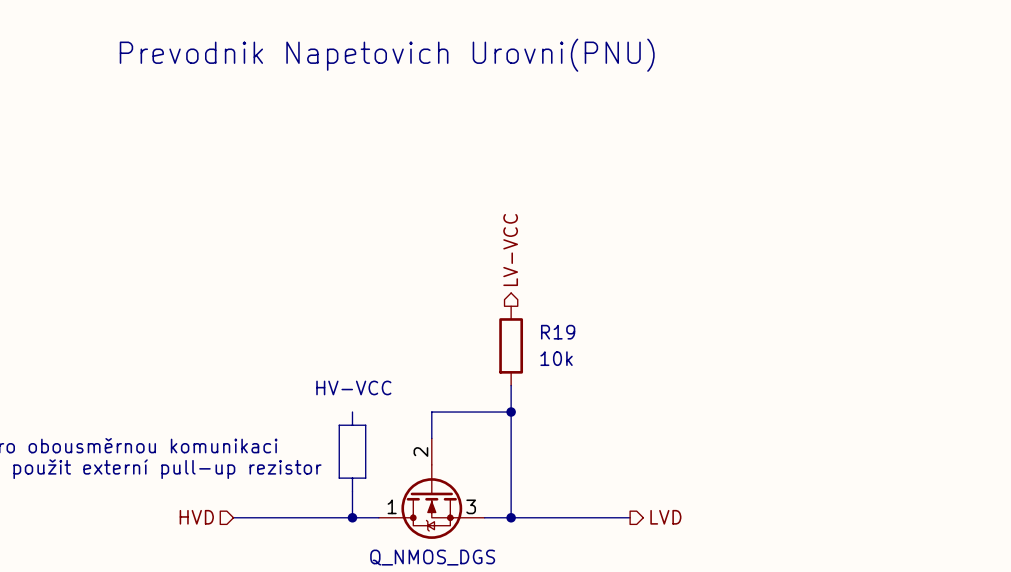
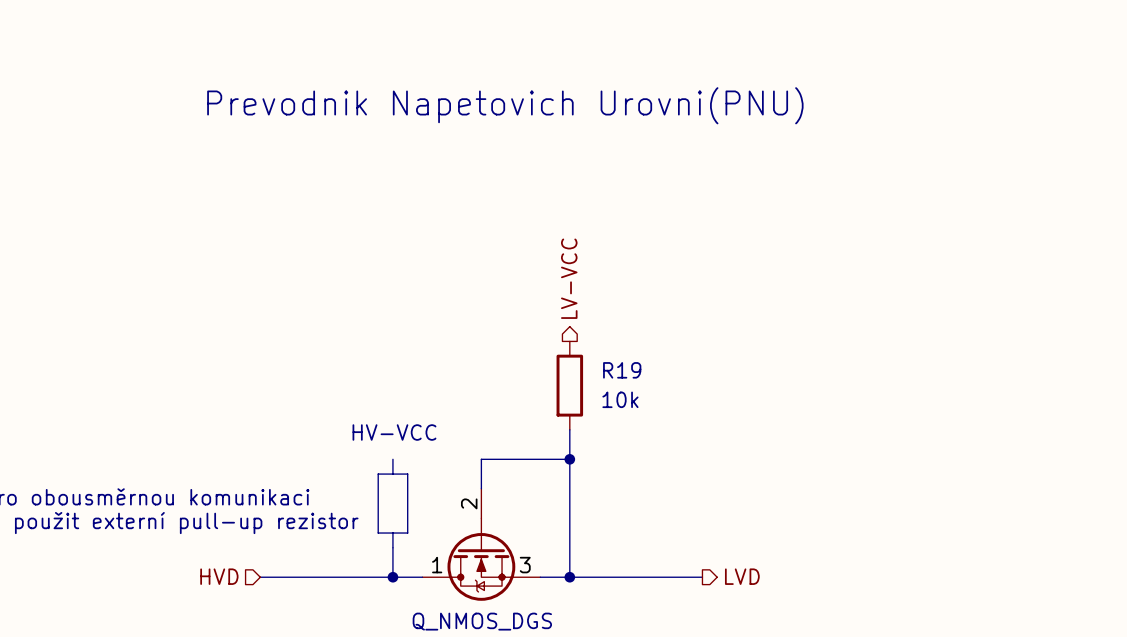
text position: Prevodnik Napetovich Urovni(PNU) (387, 55) -> Prevodnik Napetovich Urovni(PNU) (505, 105)

